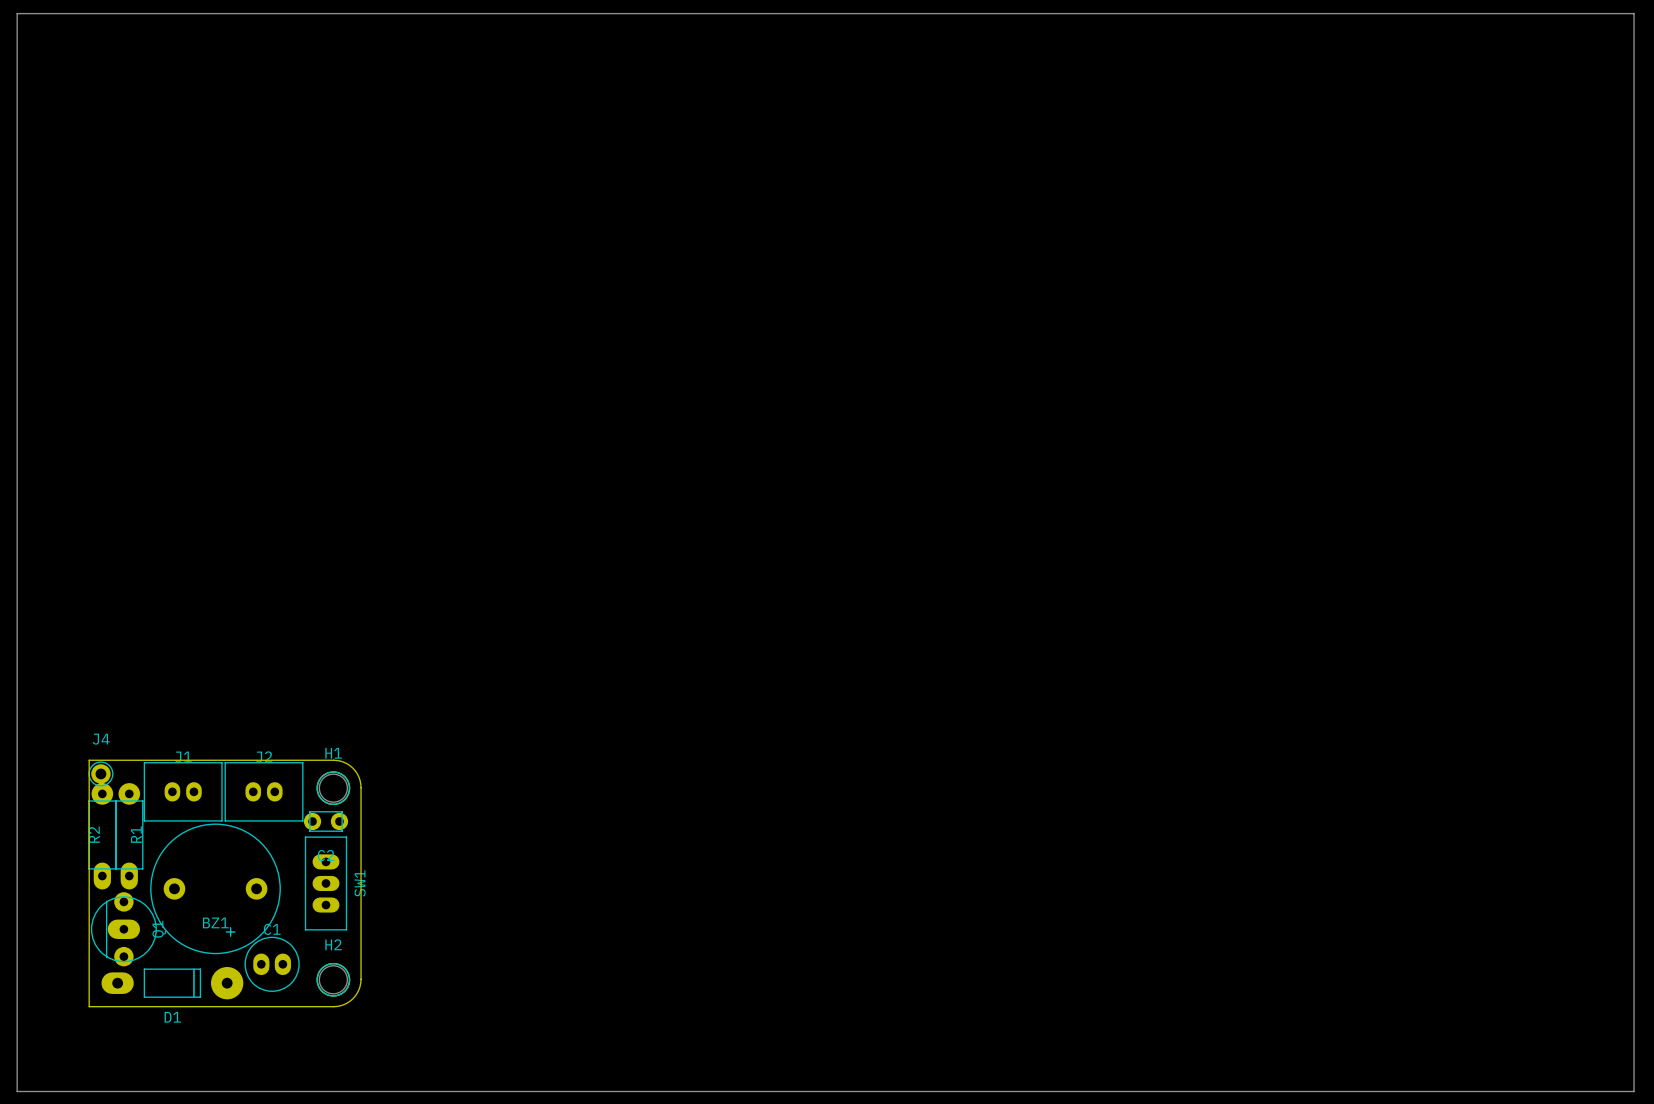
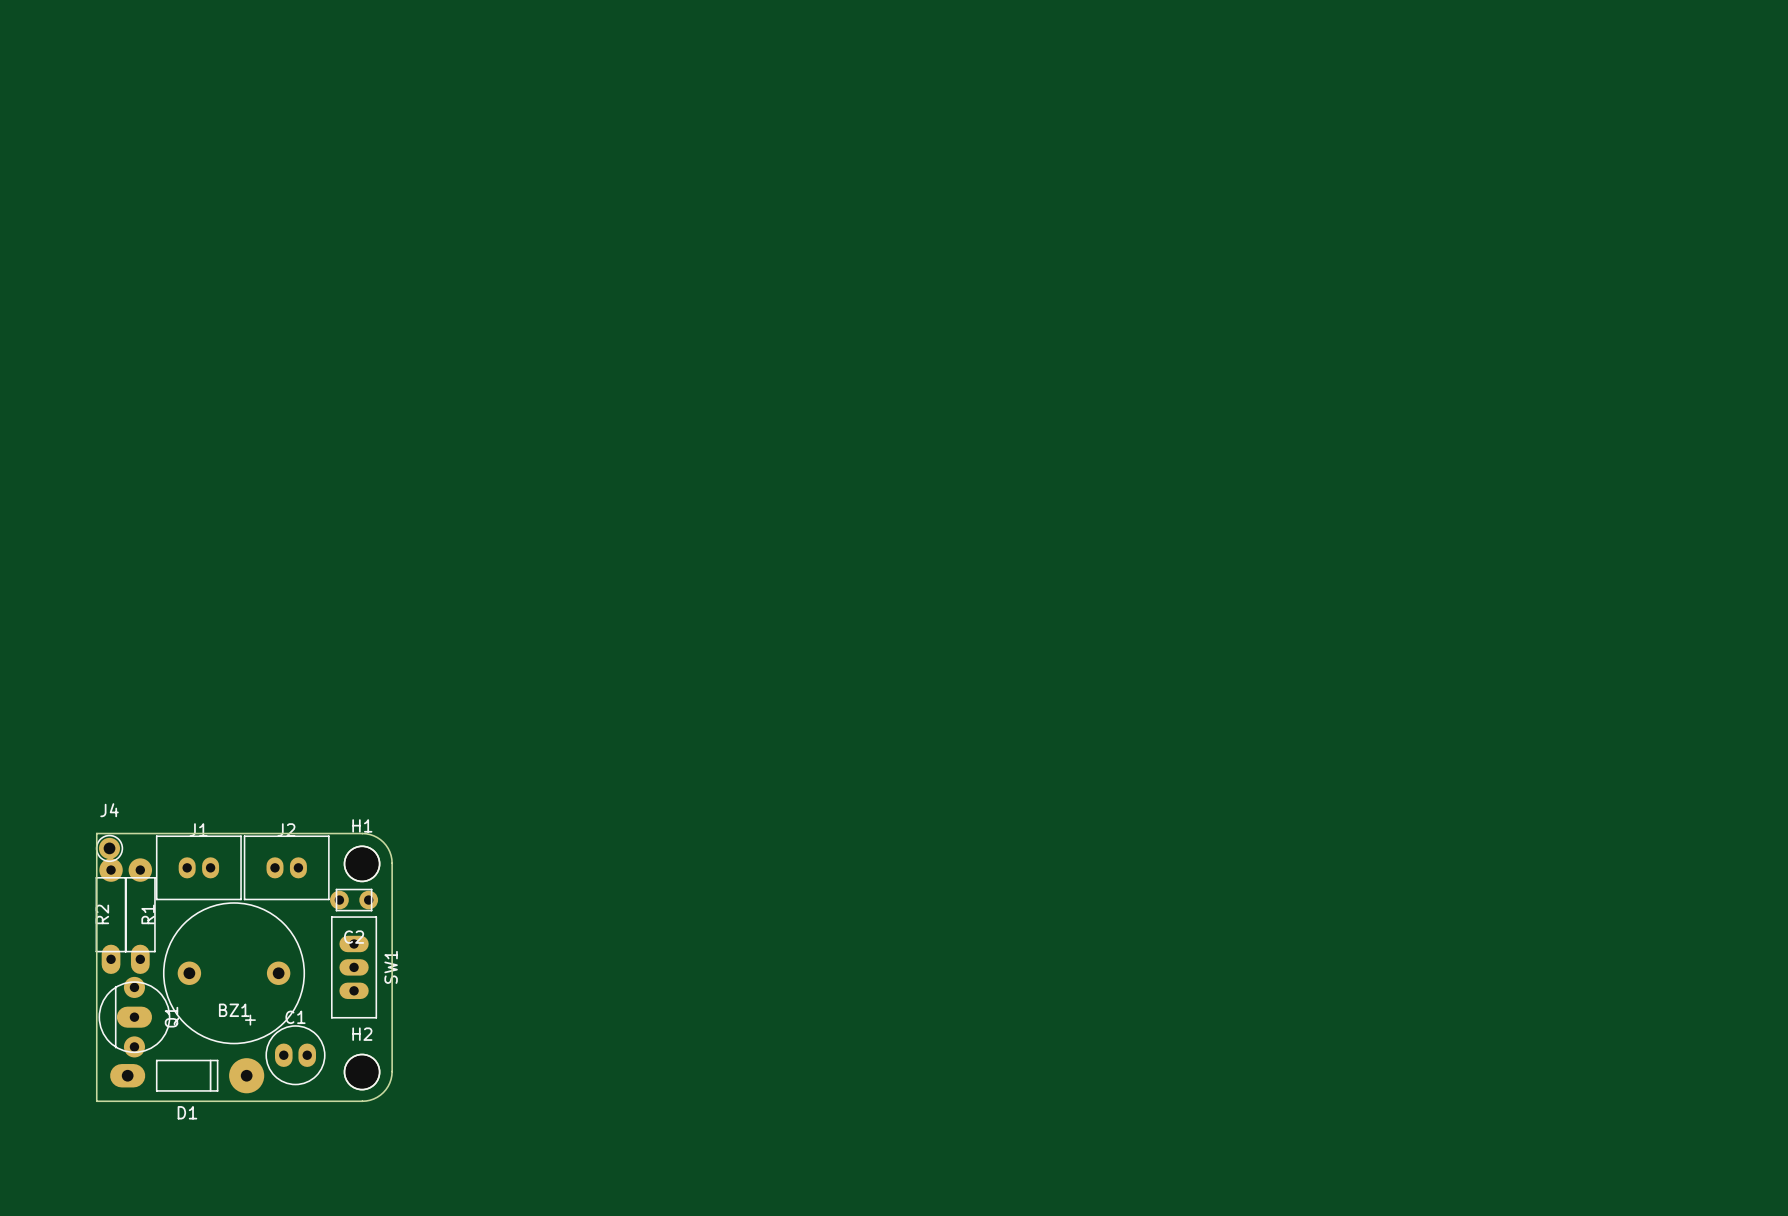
line: (17, 13) (1634, 13) (1634, 1091) (17, 1091) (17, 13) -> none
drawing: [318, 773, 348, 803] -> none
drawing: [318, 965, 348, 995] -> none

